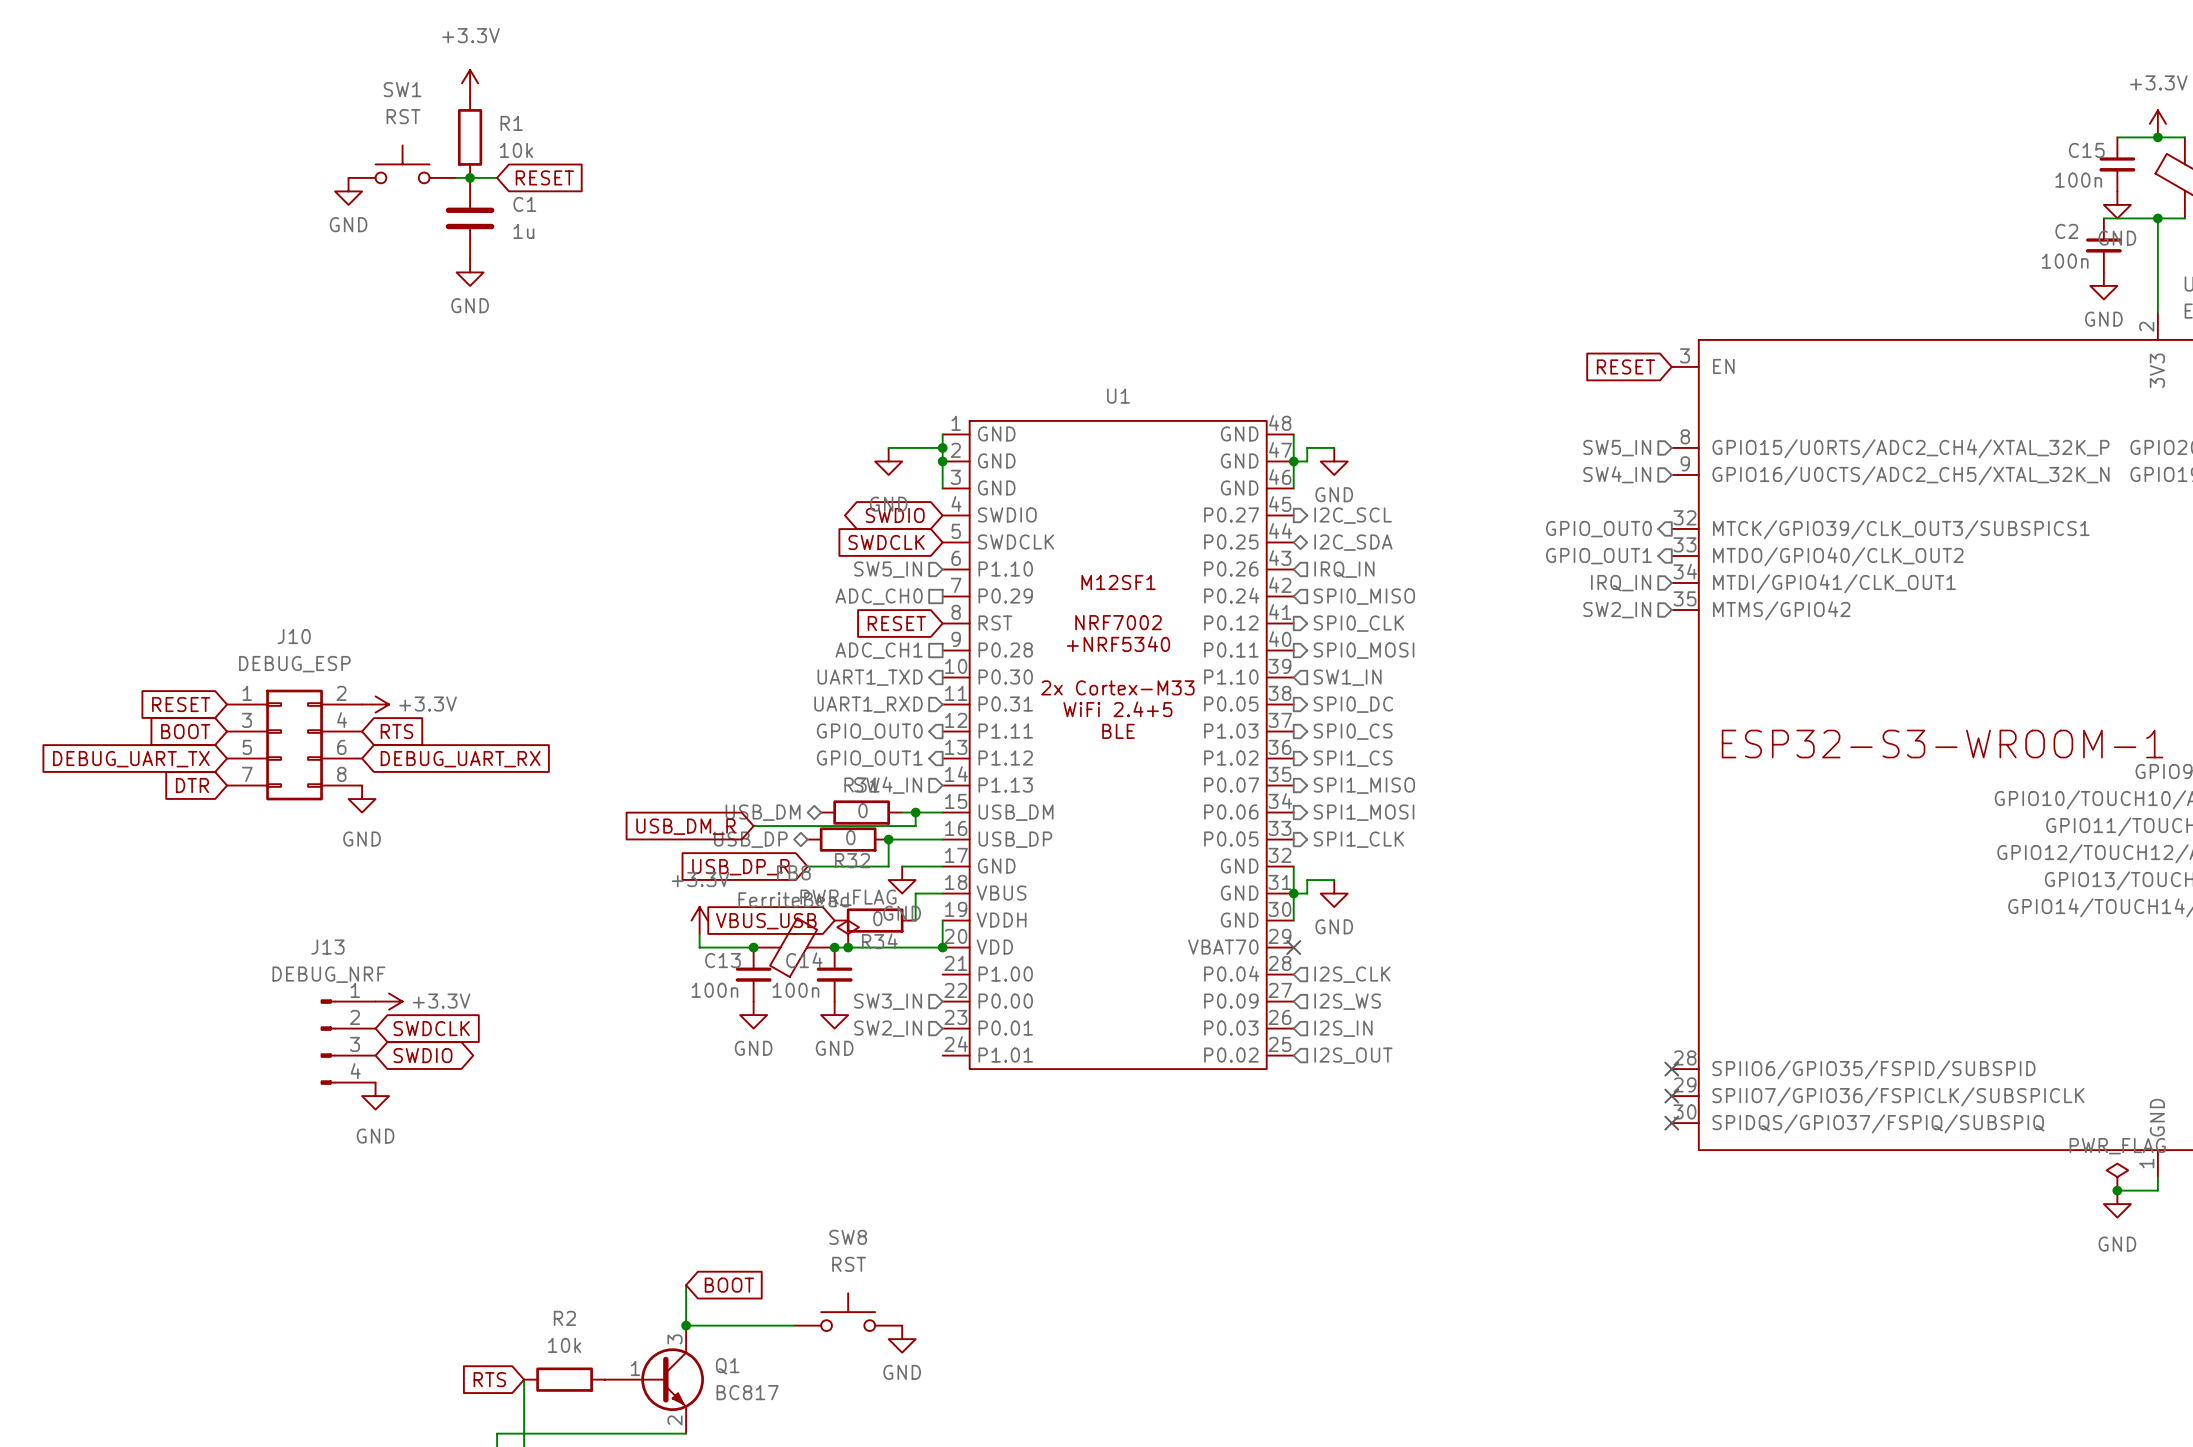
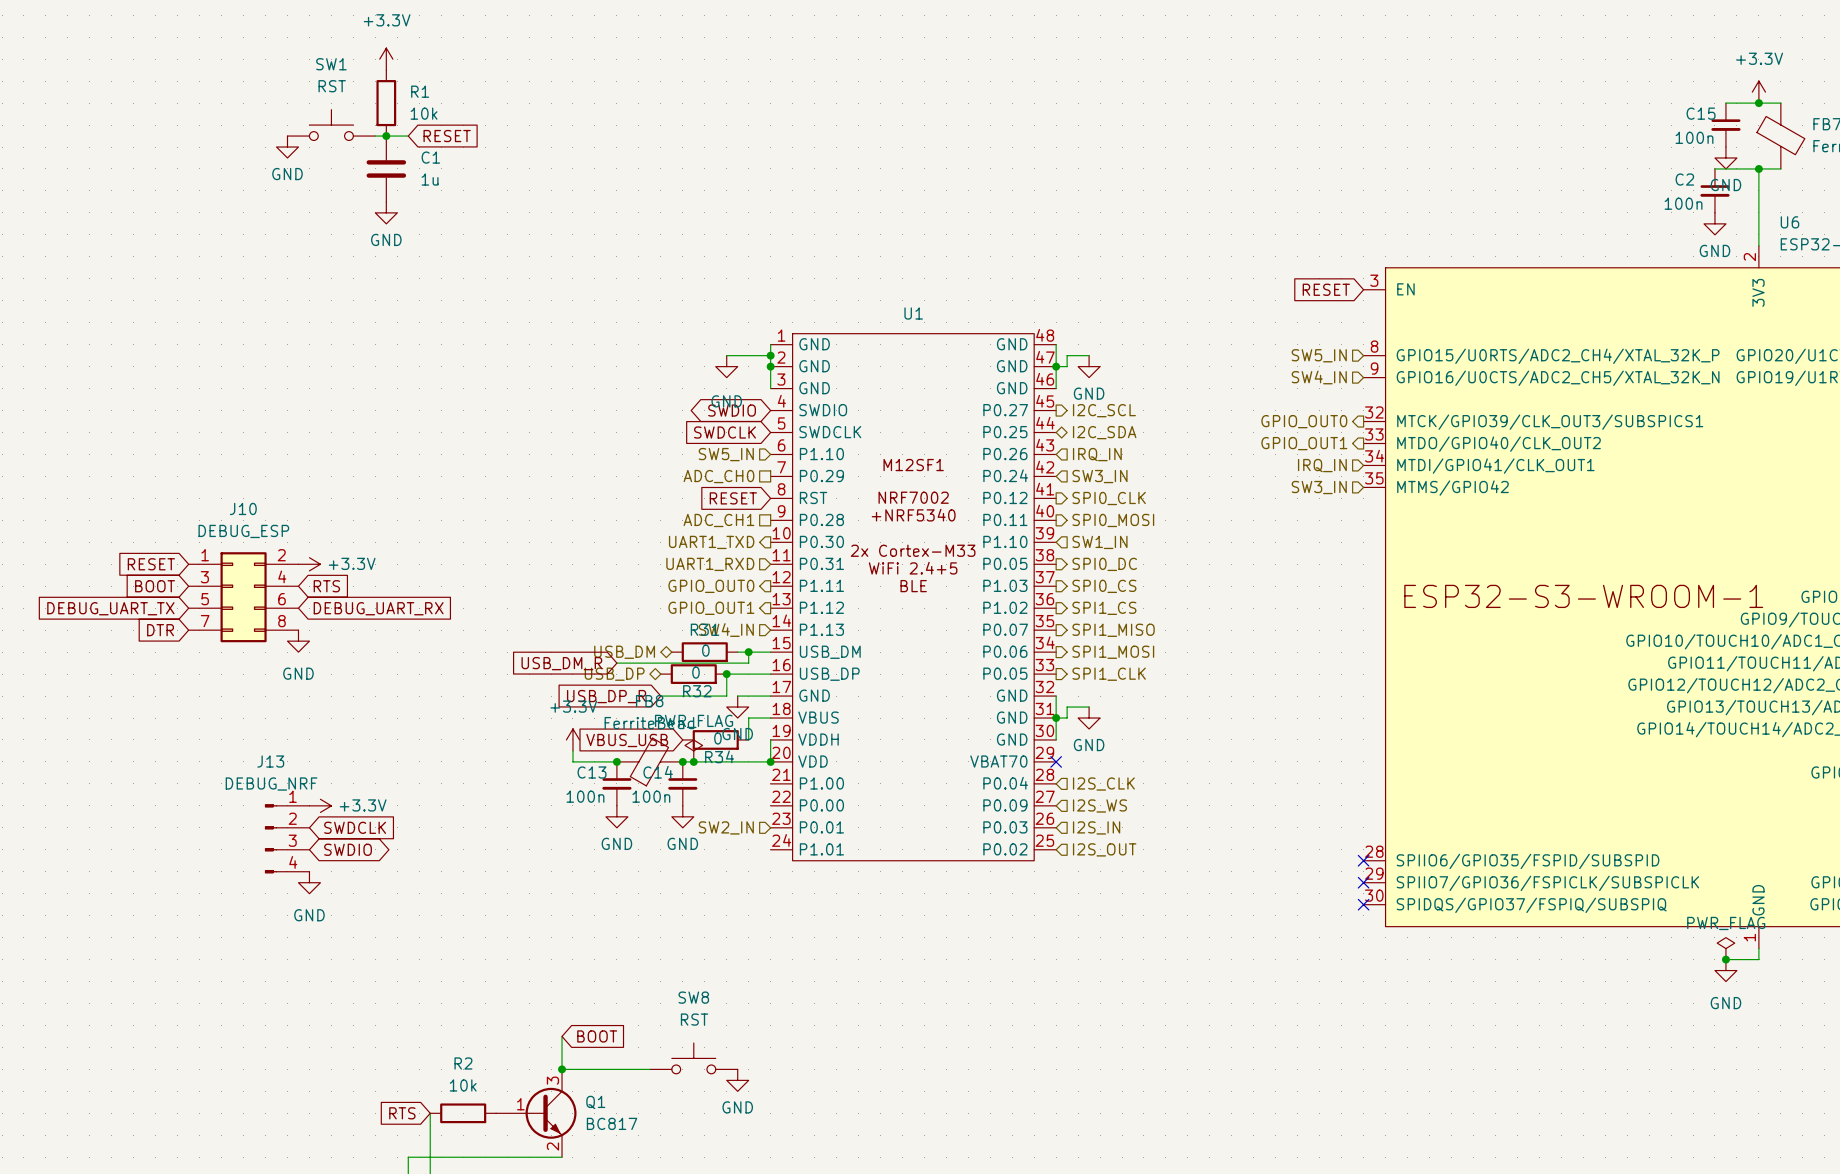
hierarchical label: SPI0_MISO (1364, 596) -> SW3_IN (1099, 476)
hierarchical label: SW2_IN (1617, 610) -> SW3_IN (1319, 487)
hierarchical label: SW3_IN (888, 1001) -> none

